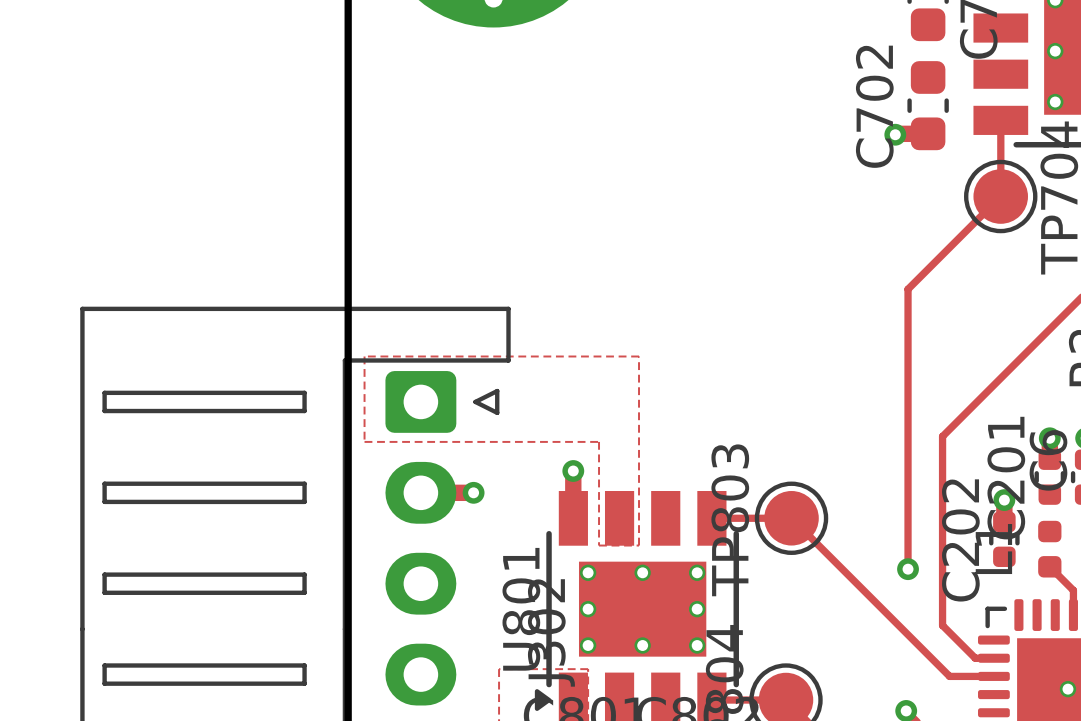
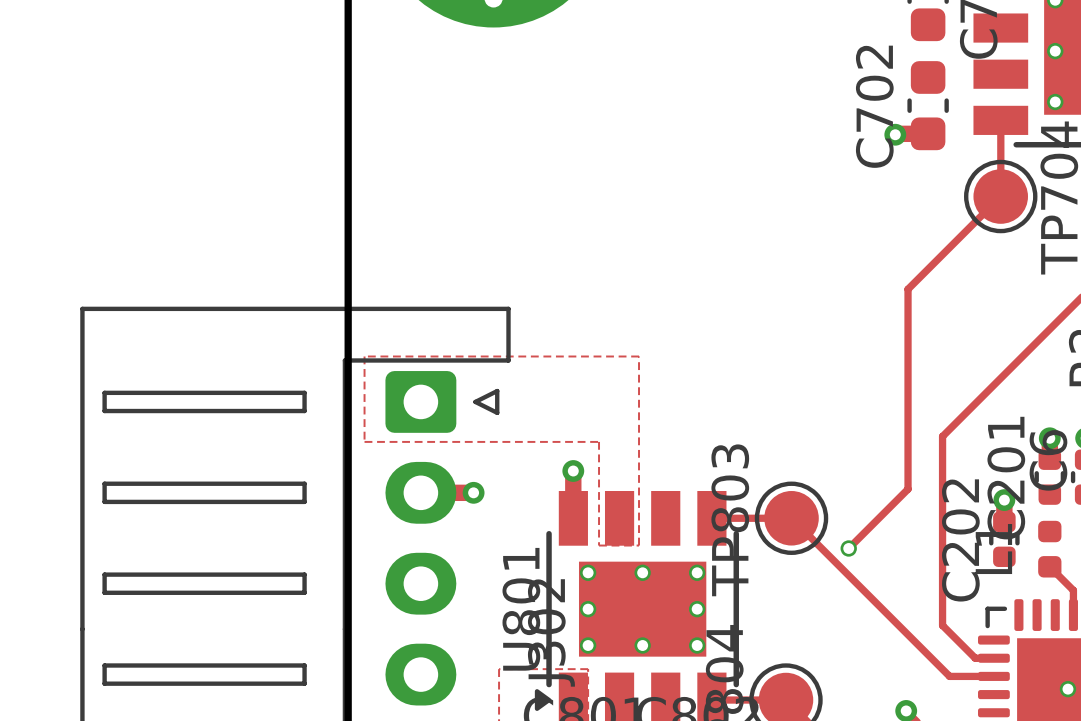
track: (908, 489) (908, 569) -> (908, 489) (848, 548)
via: none -> (848, 548)
via: (908, 569) -> none

